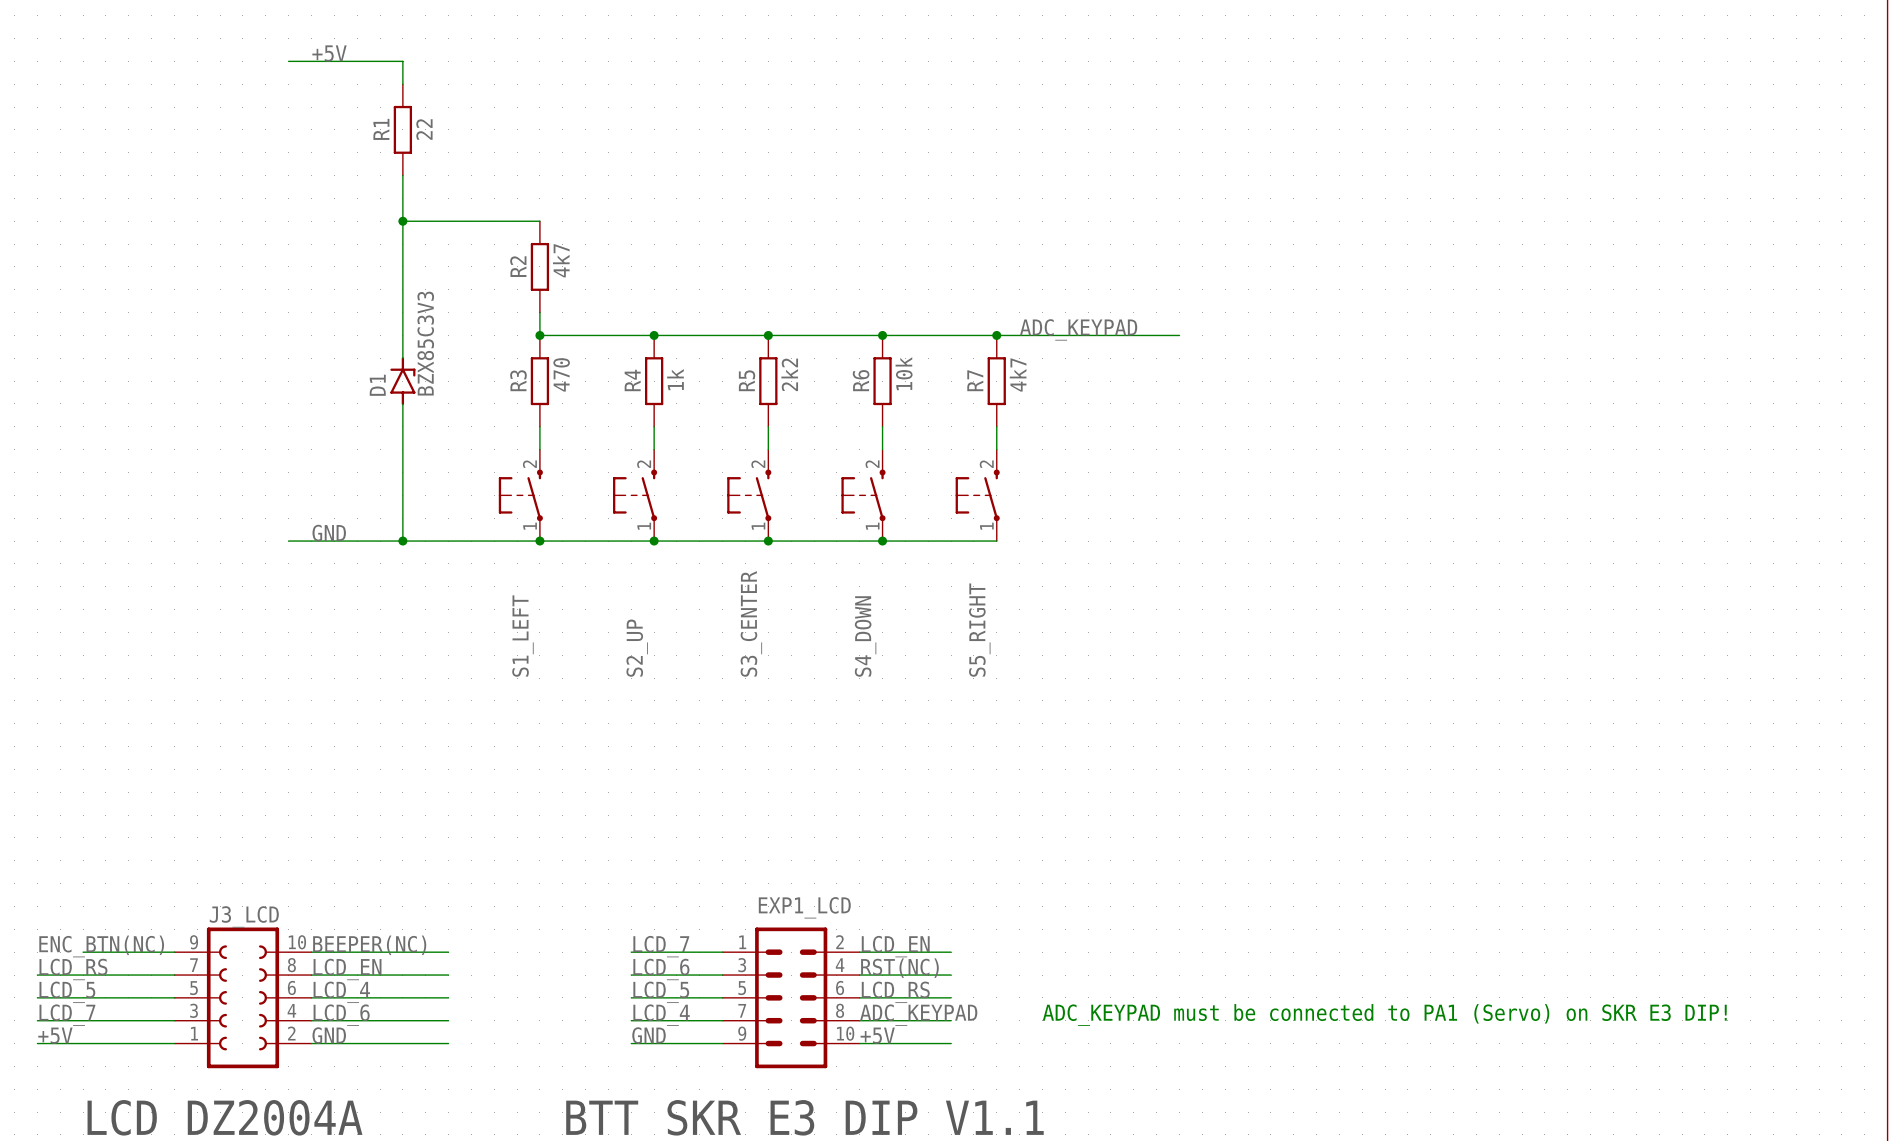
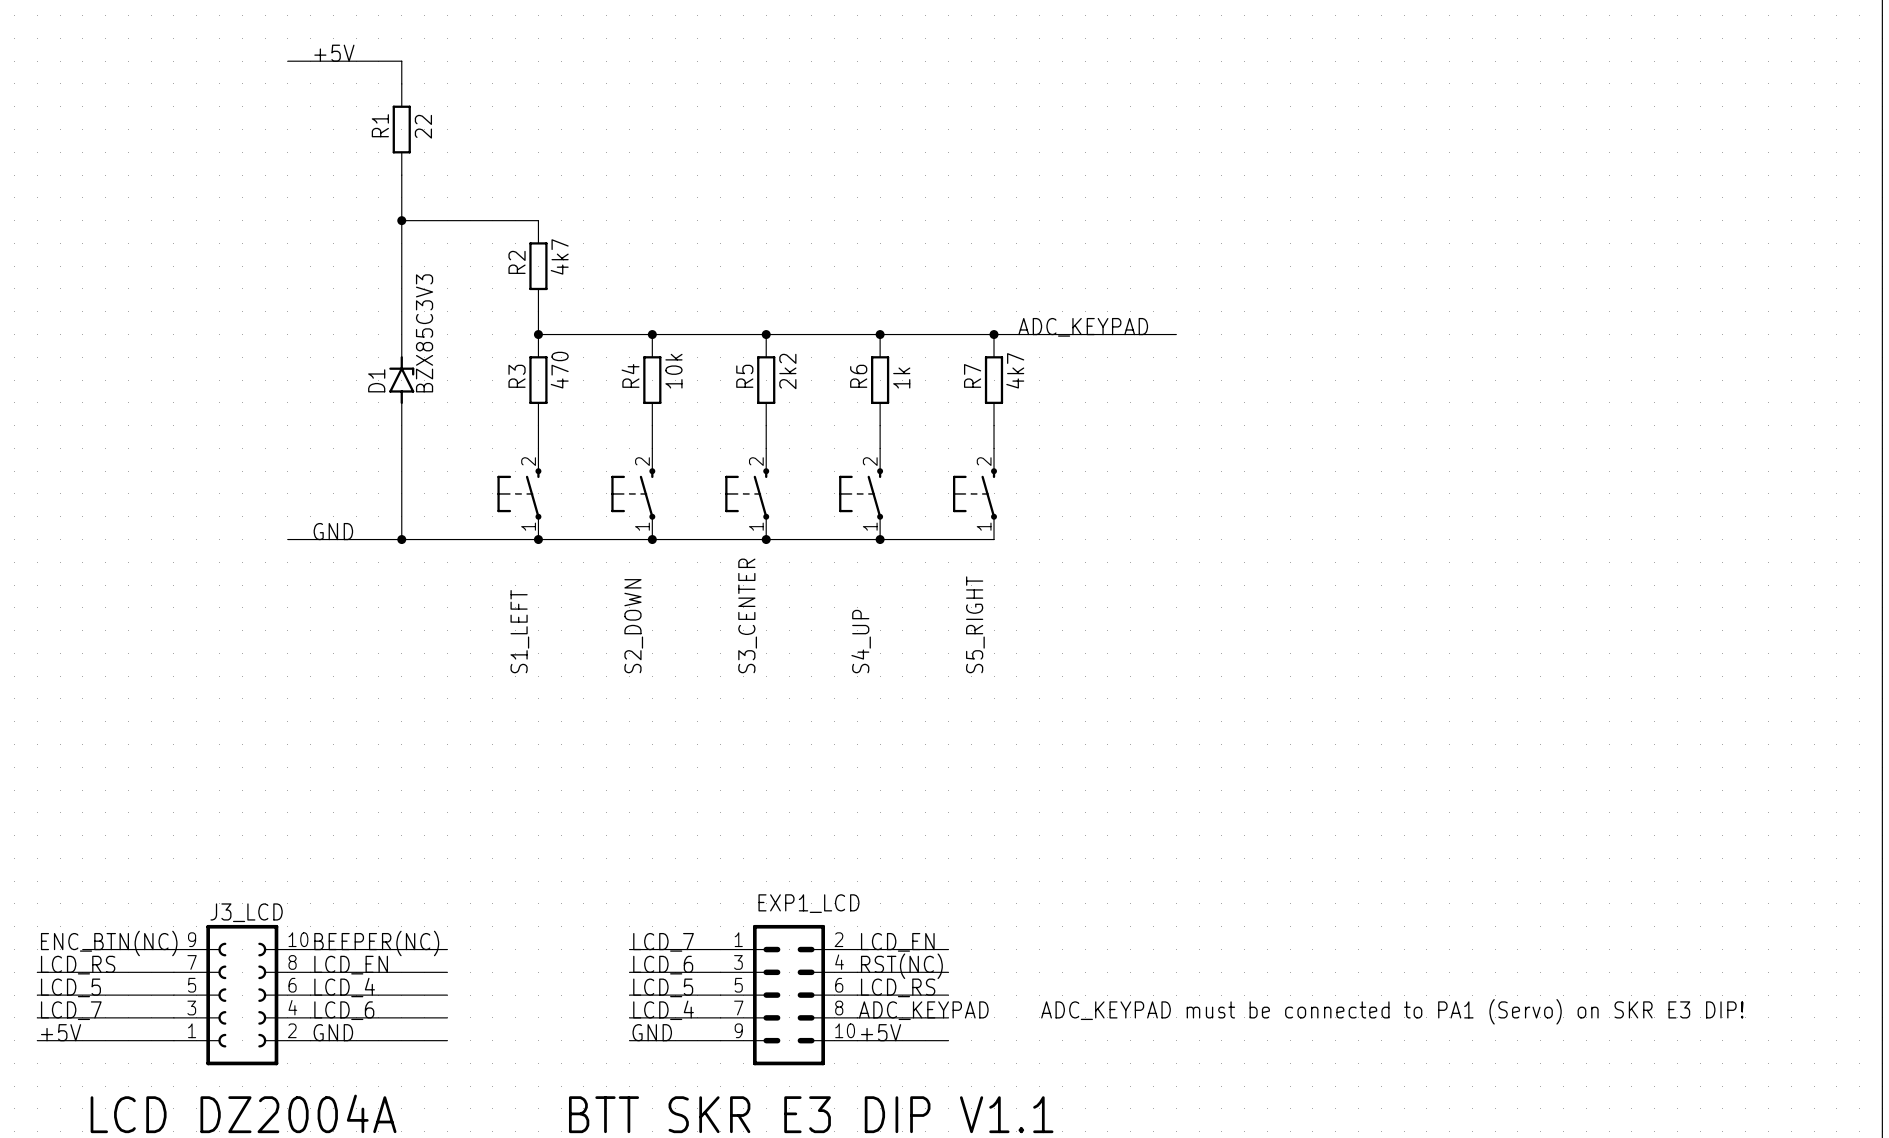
R6 value: 10k (904, 373) -> 1k (901, 378)
R4 value: 1k (675, 379) -> 10k (673, 371)
S4_DOWN name: S4_DOWN (865, 636) -> S4_UP (861, 641)
S2_UP name: S2_UP (637, 648) -> S2_DOWN (633, 626)

